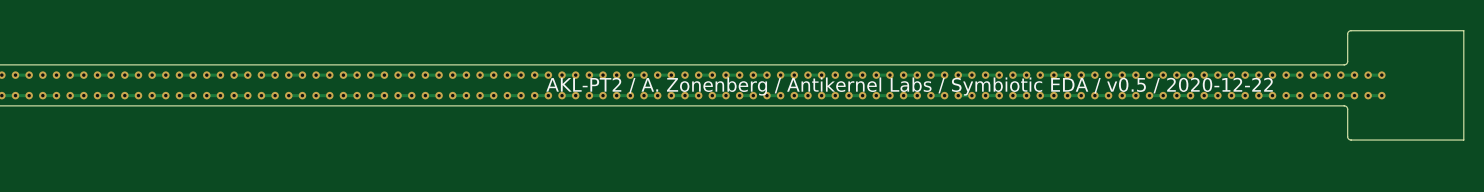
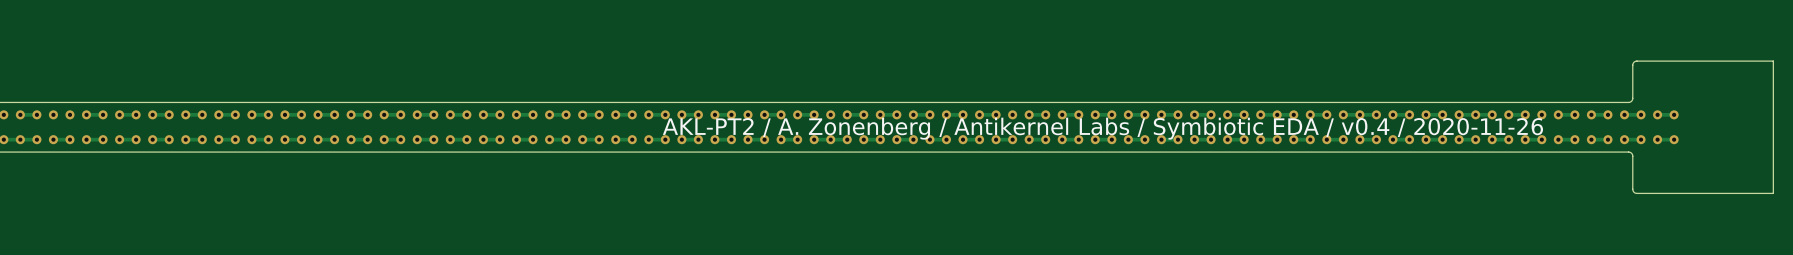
text: AKL-PT2 / A. Zonenberg / Antikernel Labs / Symbiotic EDA / v0.5 / 2020-12-22 (909, 86) -> AKL-PT2 / A. Zonenberg / Antikernel Labs / Symbiotic EDA / v0.4 / 2020-11-26 (1102, 128)

